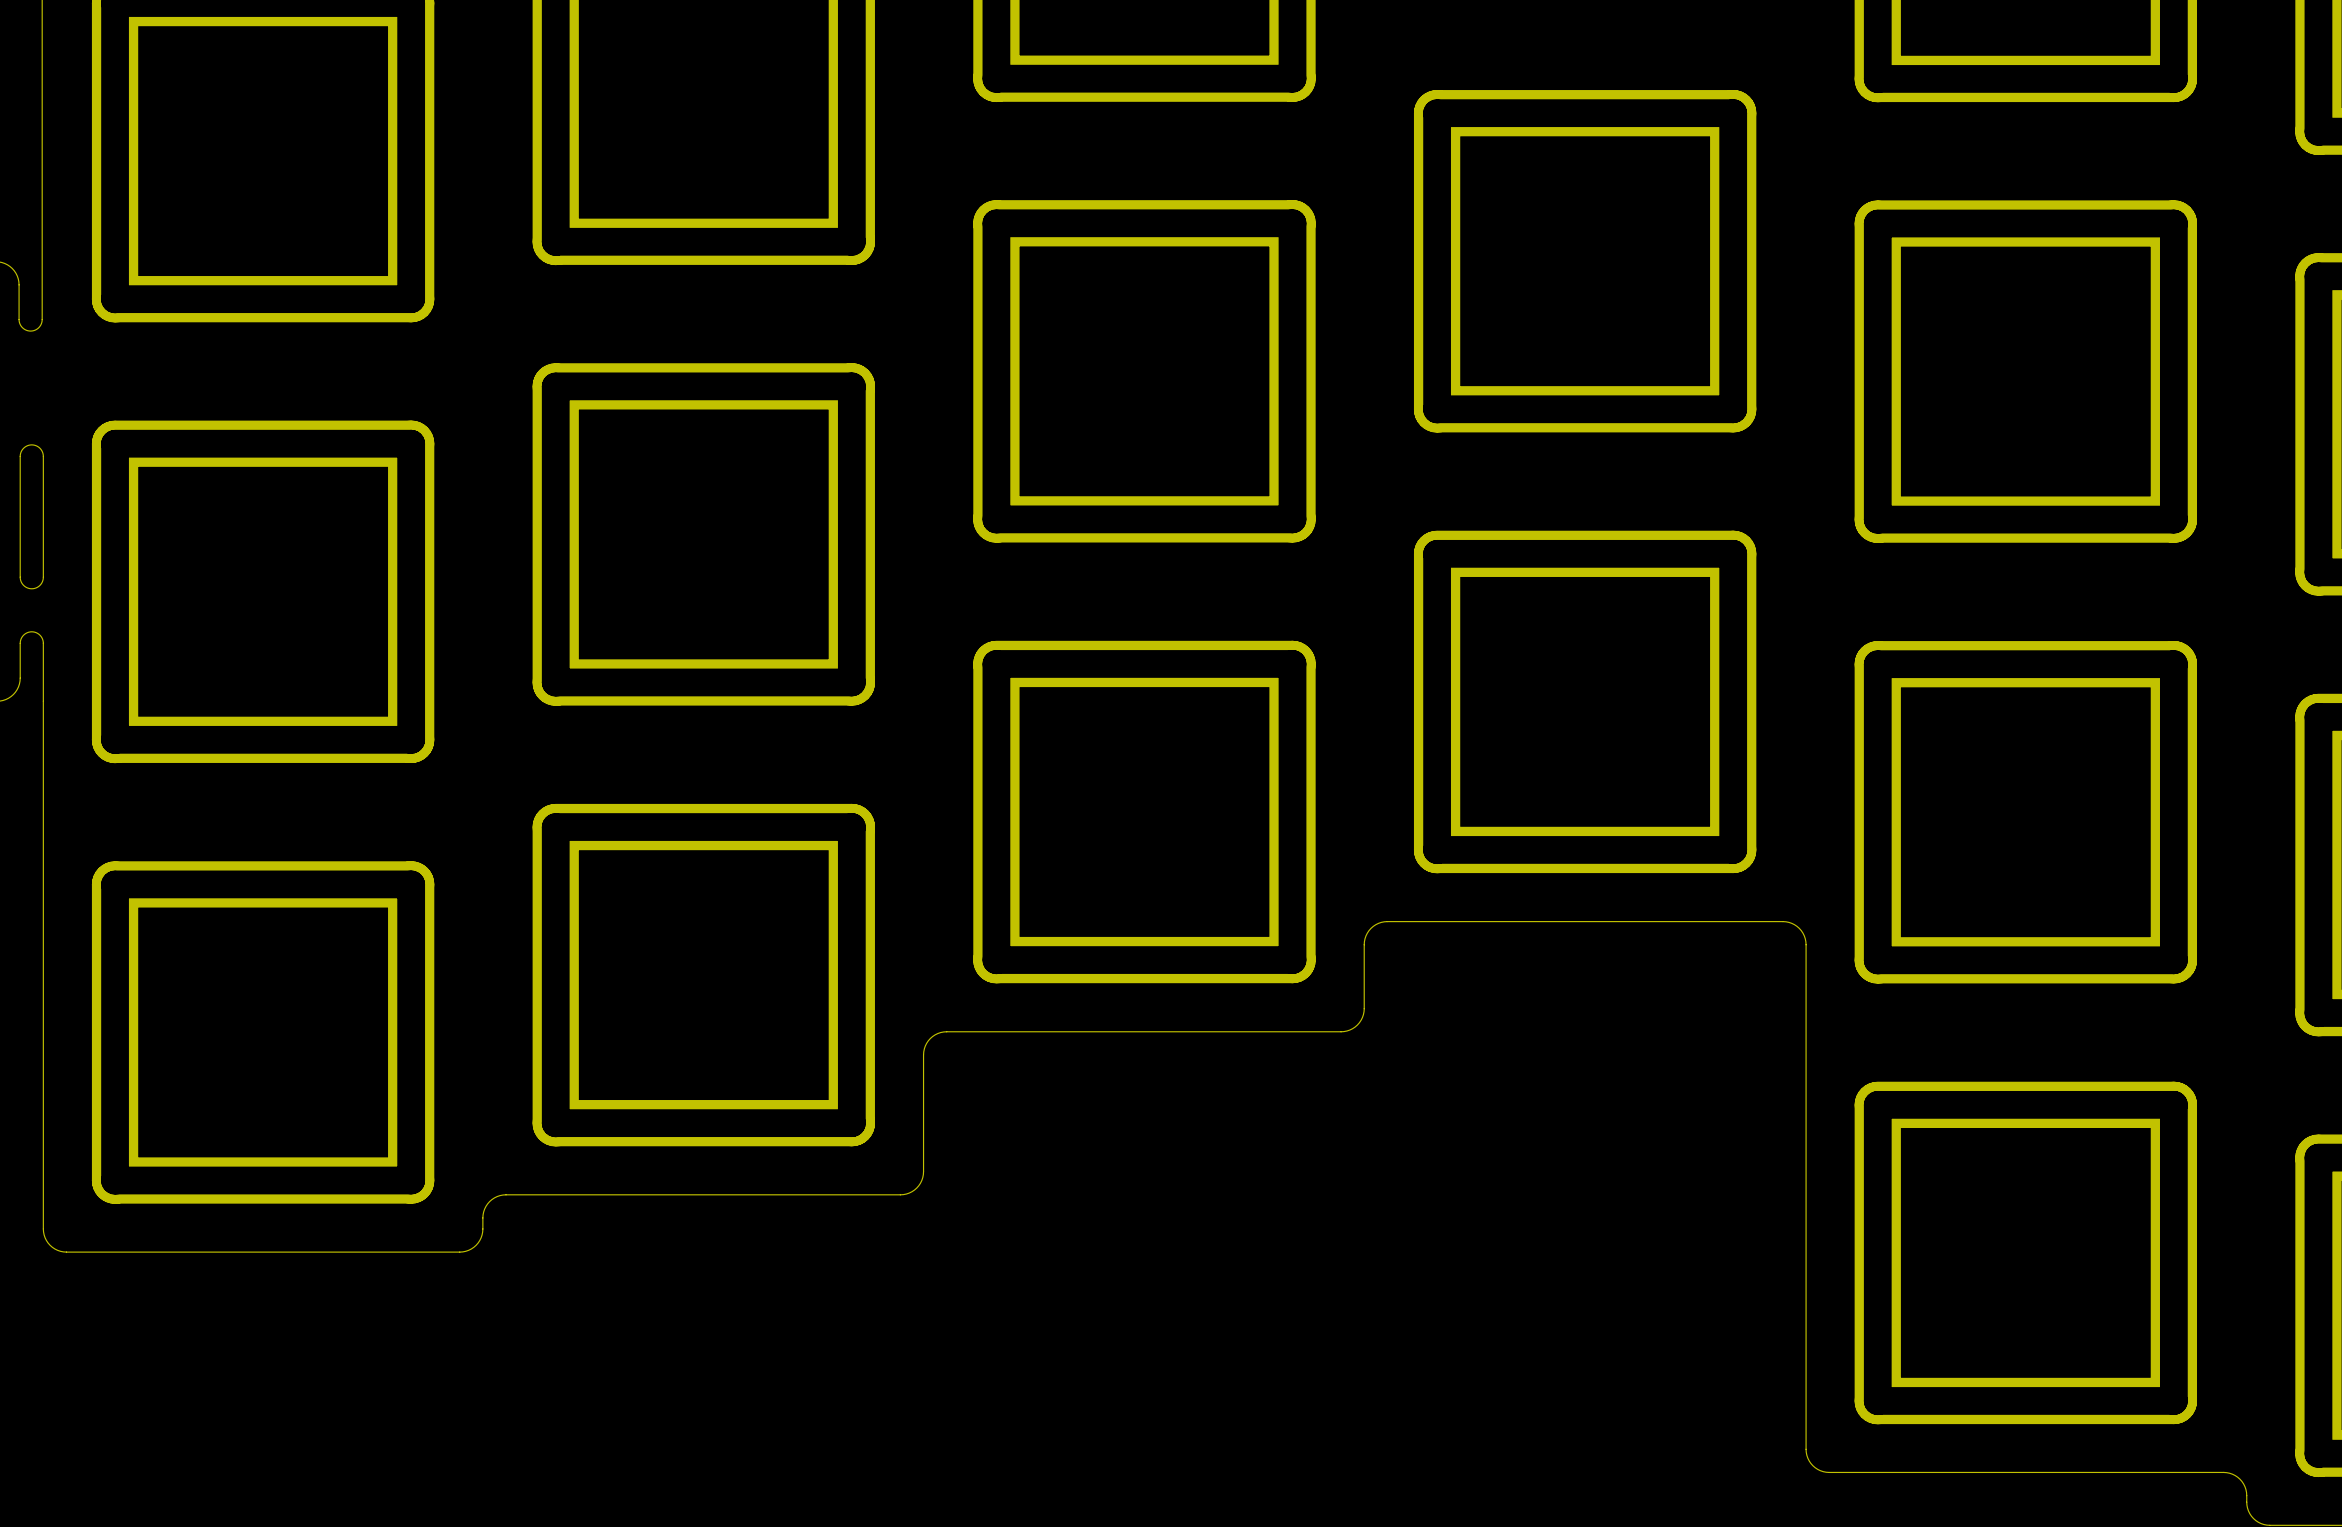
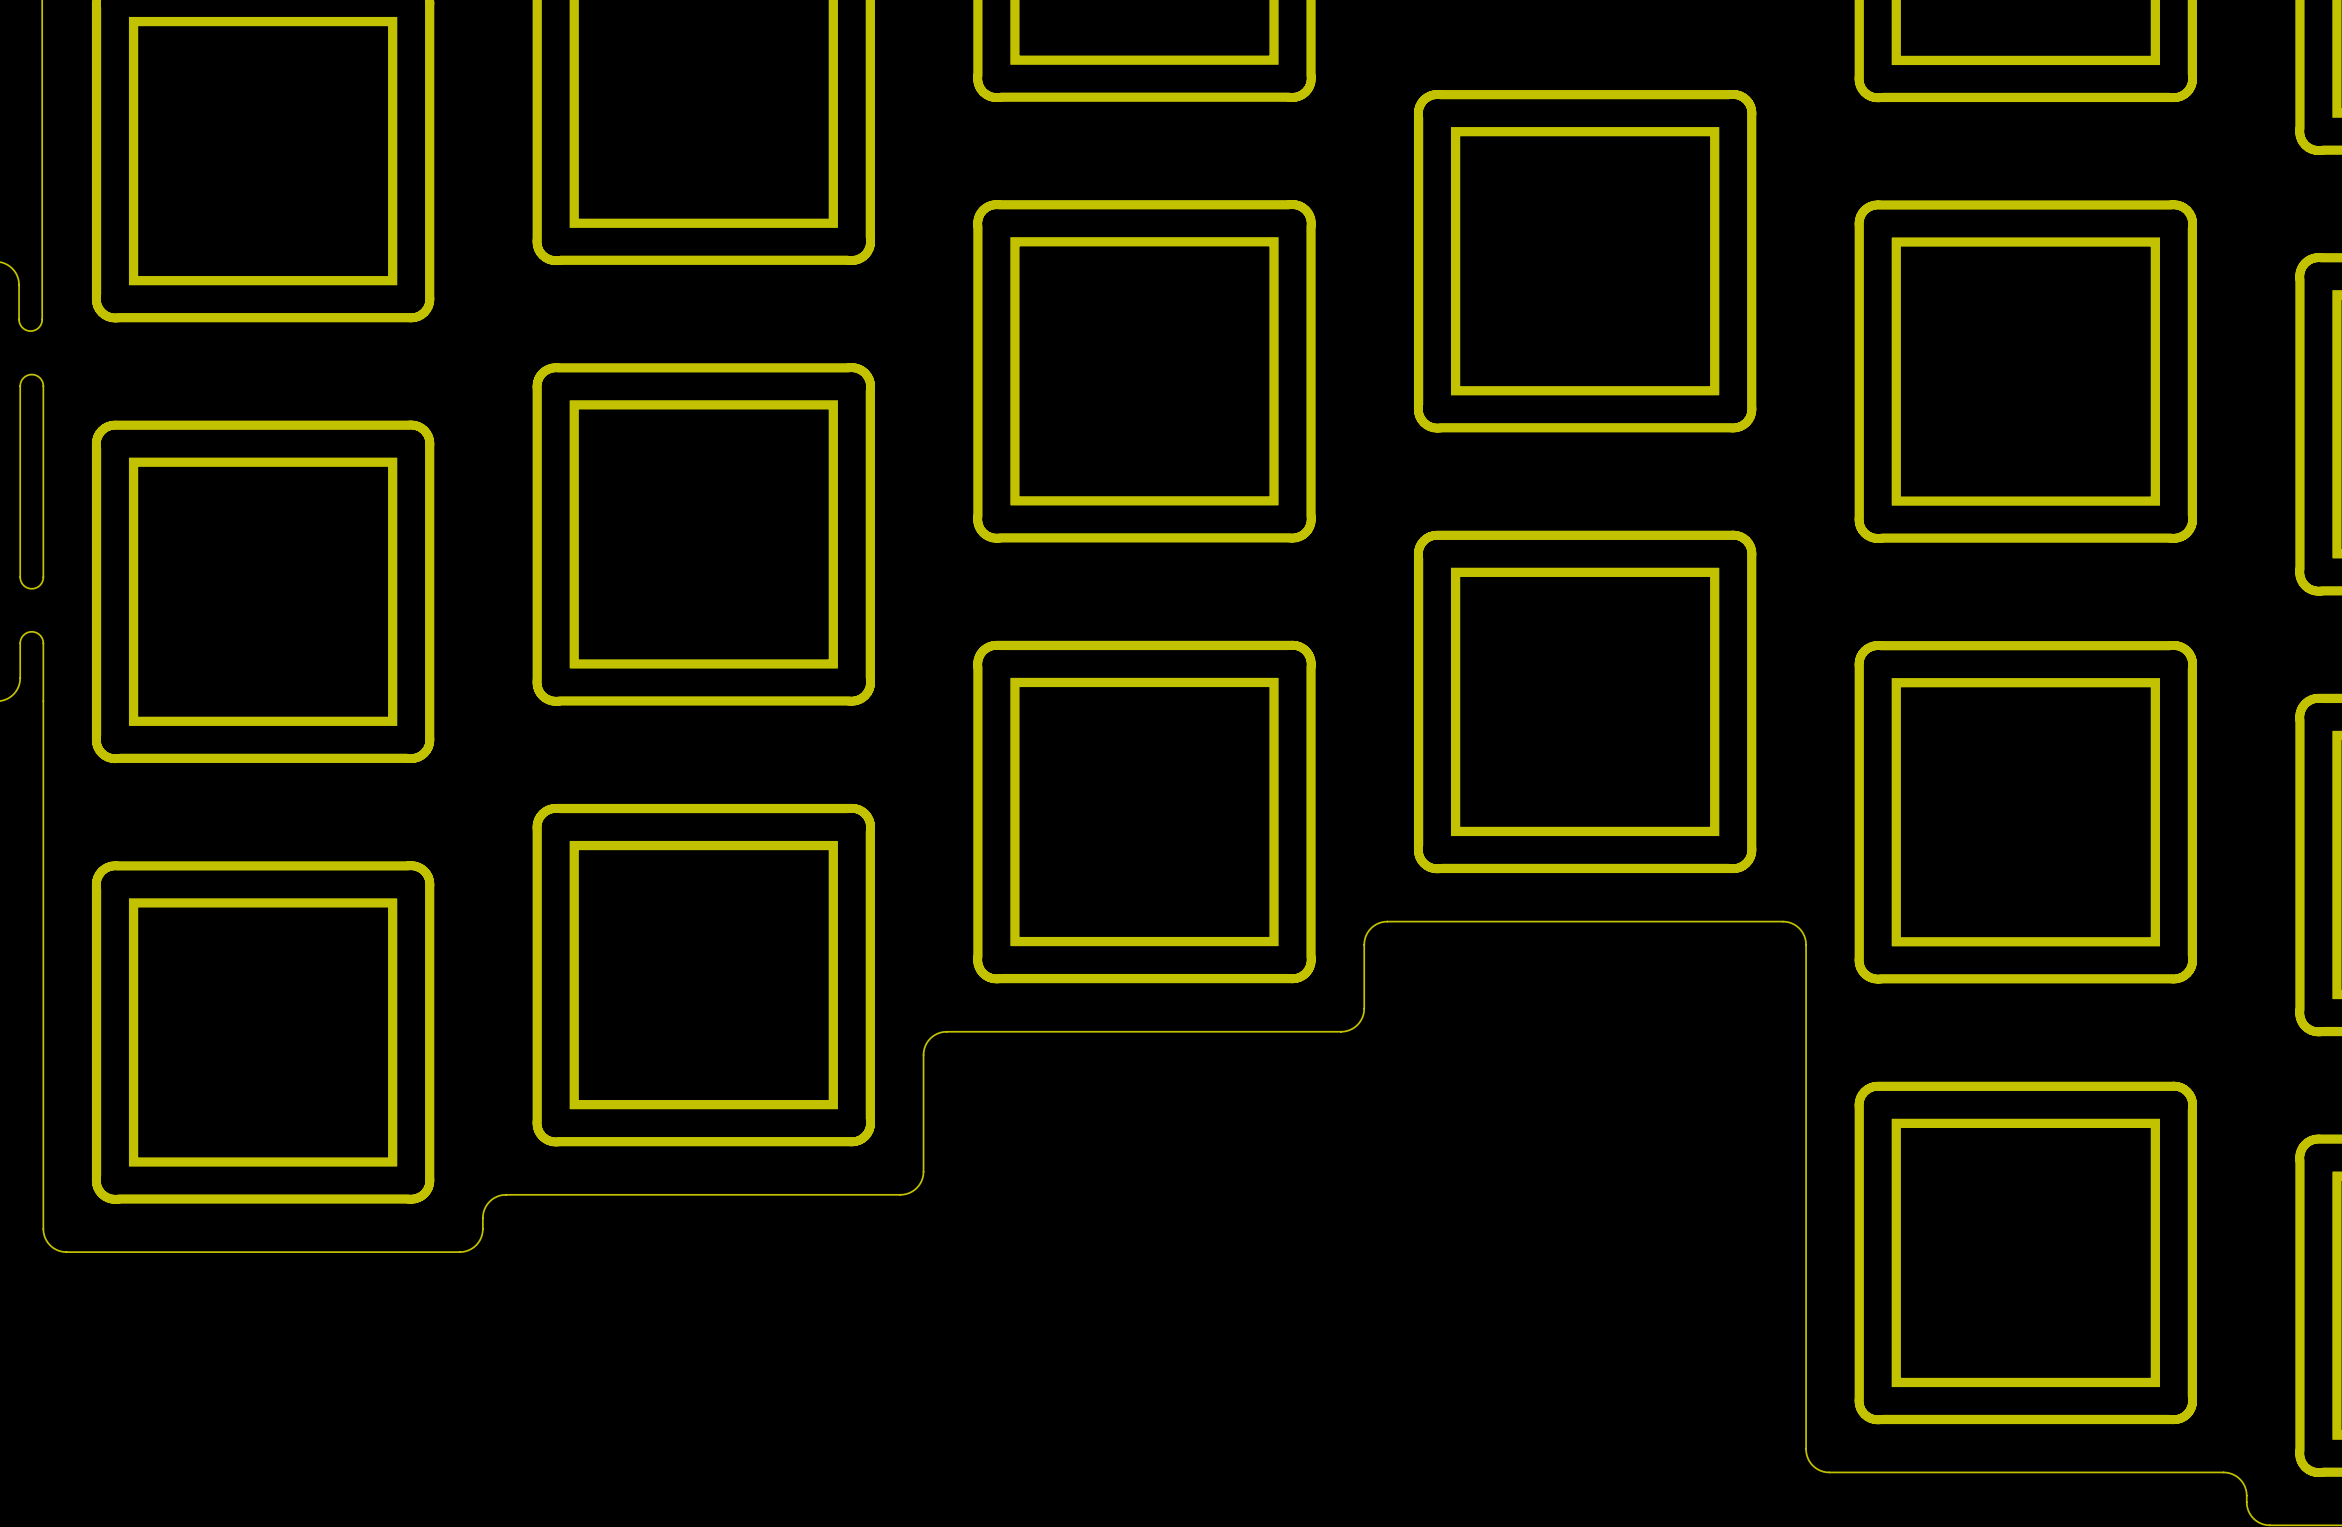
board edge: (20, 456) (23, 448) (31, 444) (39, 448) (43, 456) -> (20, 456) (20, 384) (24, 376) (31, 374) (38, 376) (43, 384) (43, 456)

